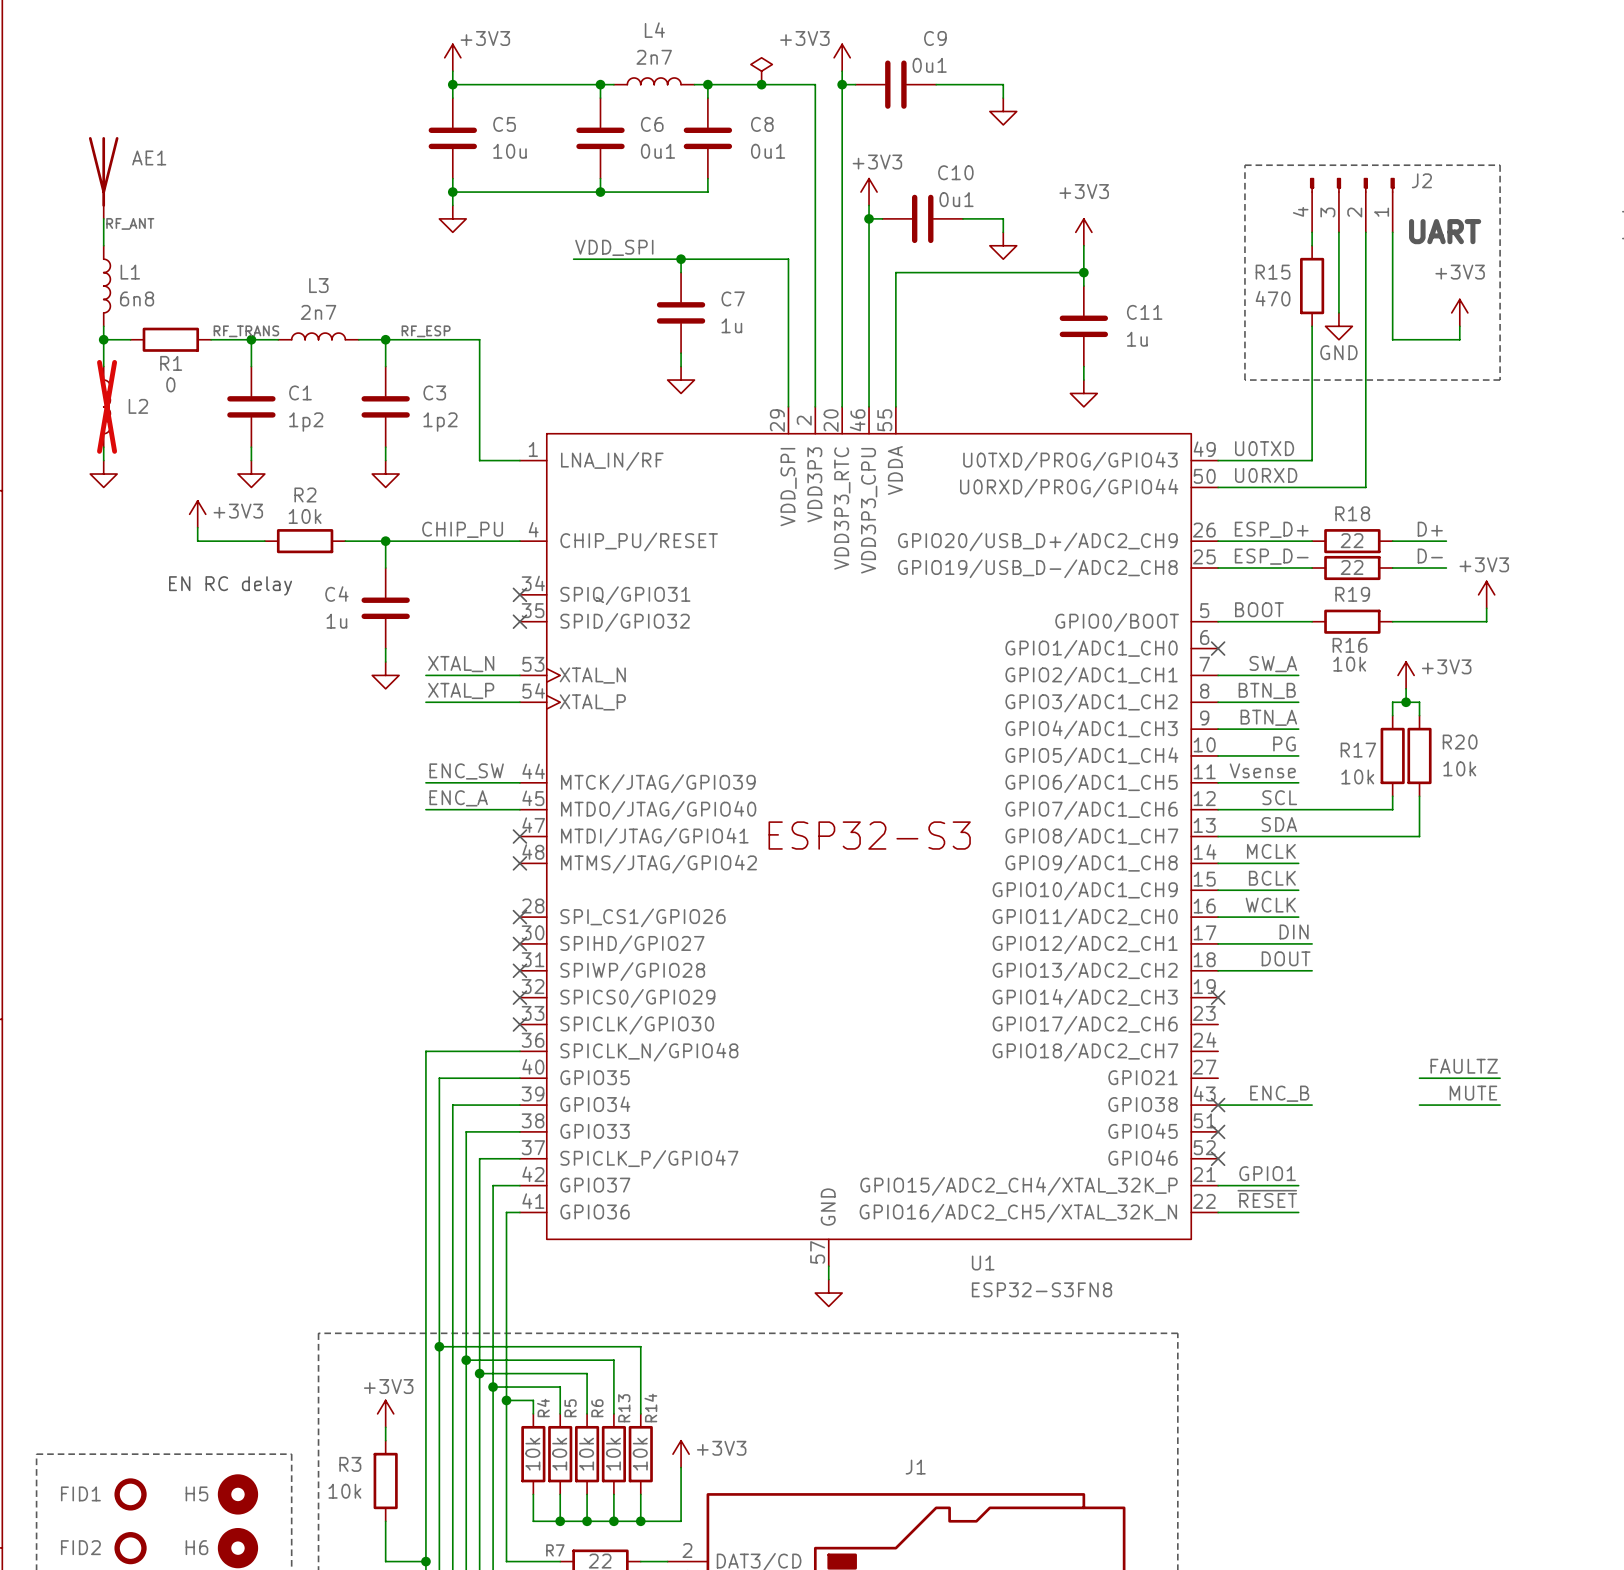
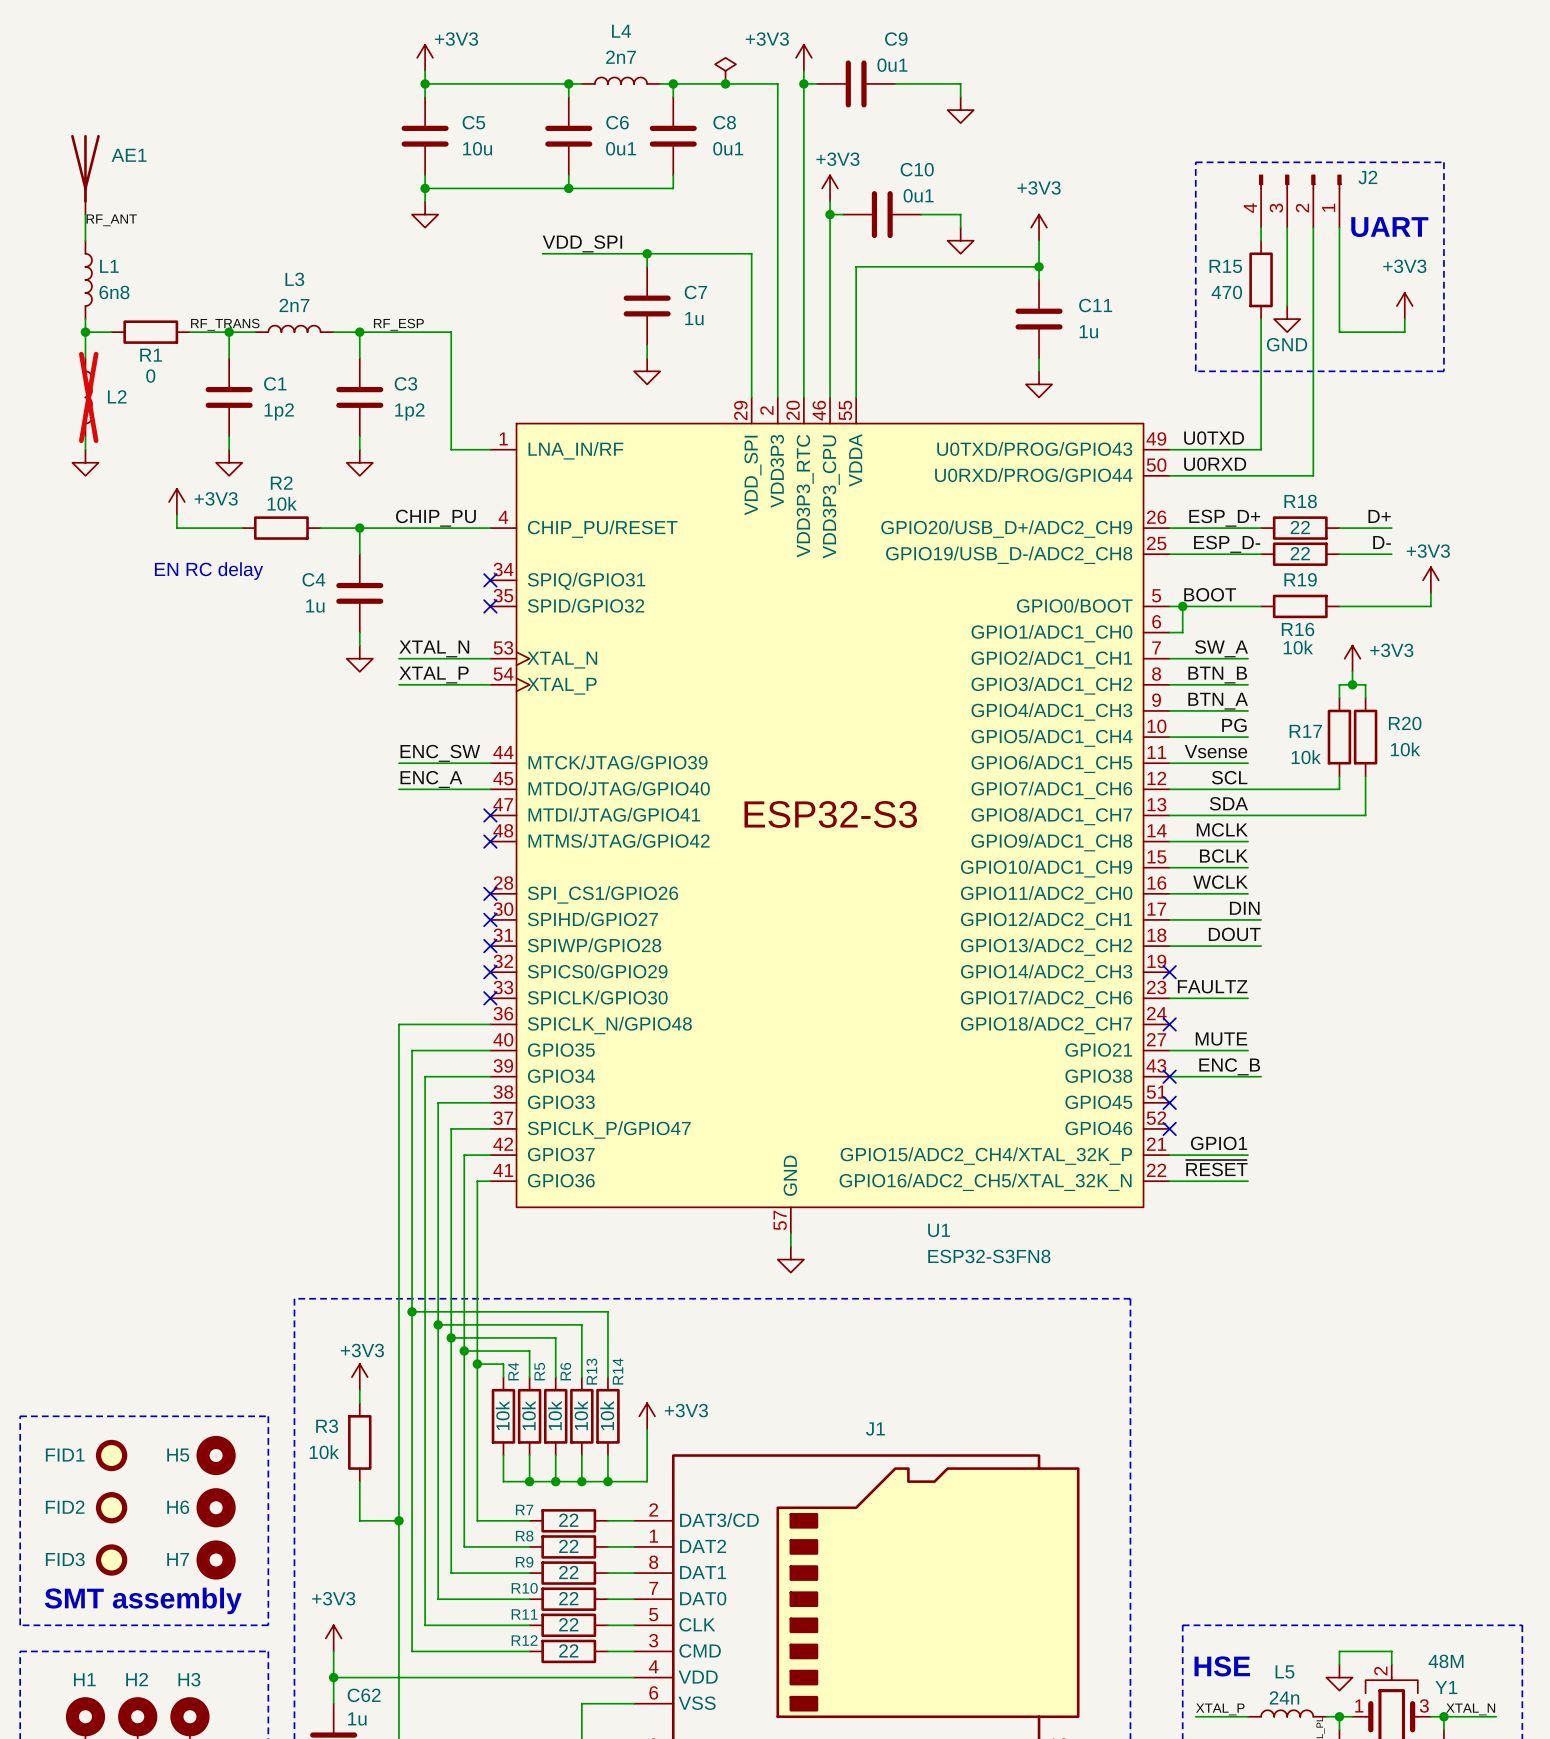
wire: none -> (1182, 606) (1182, 632) (1169, 632)
junction: none -> (1182, 606)
no-connect mark: (1218, 648) -> none
no-connect mark: none -> (1169, 1024)
label position: FAULTZ (1464, 1066) -> FAULTZ (1212, 986)
wire: (1419, 1078) (1500, 1078) -> (1169, 1050) (1248, 1050)
label position: MUTE (1473, 1093) -> MUTE (1221, 1039)
wire: (1419, 1105) (1500, 1105) -> (1169, 998) (1248, 998)

